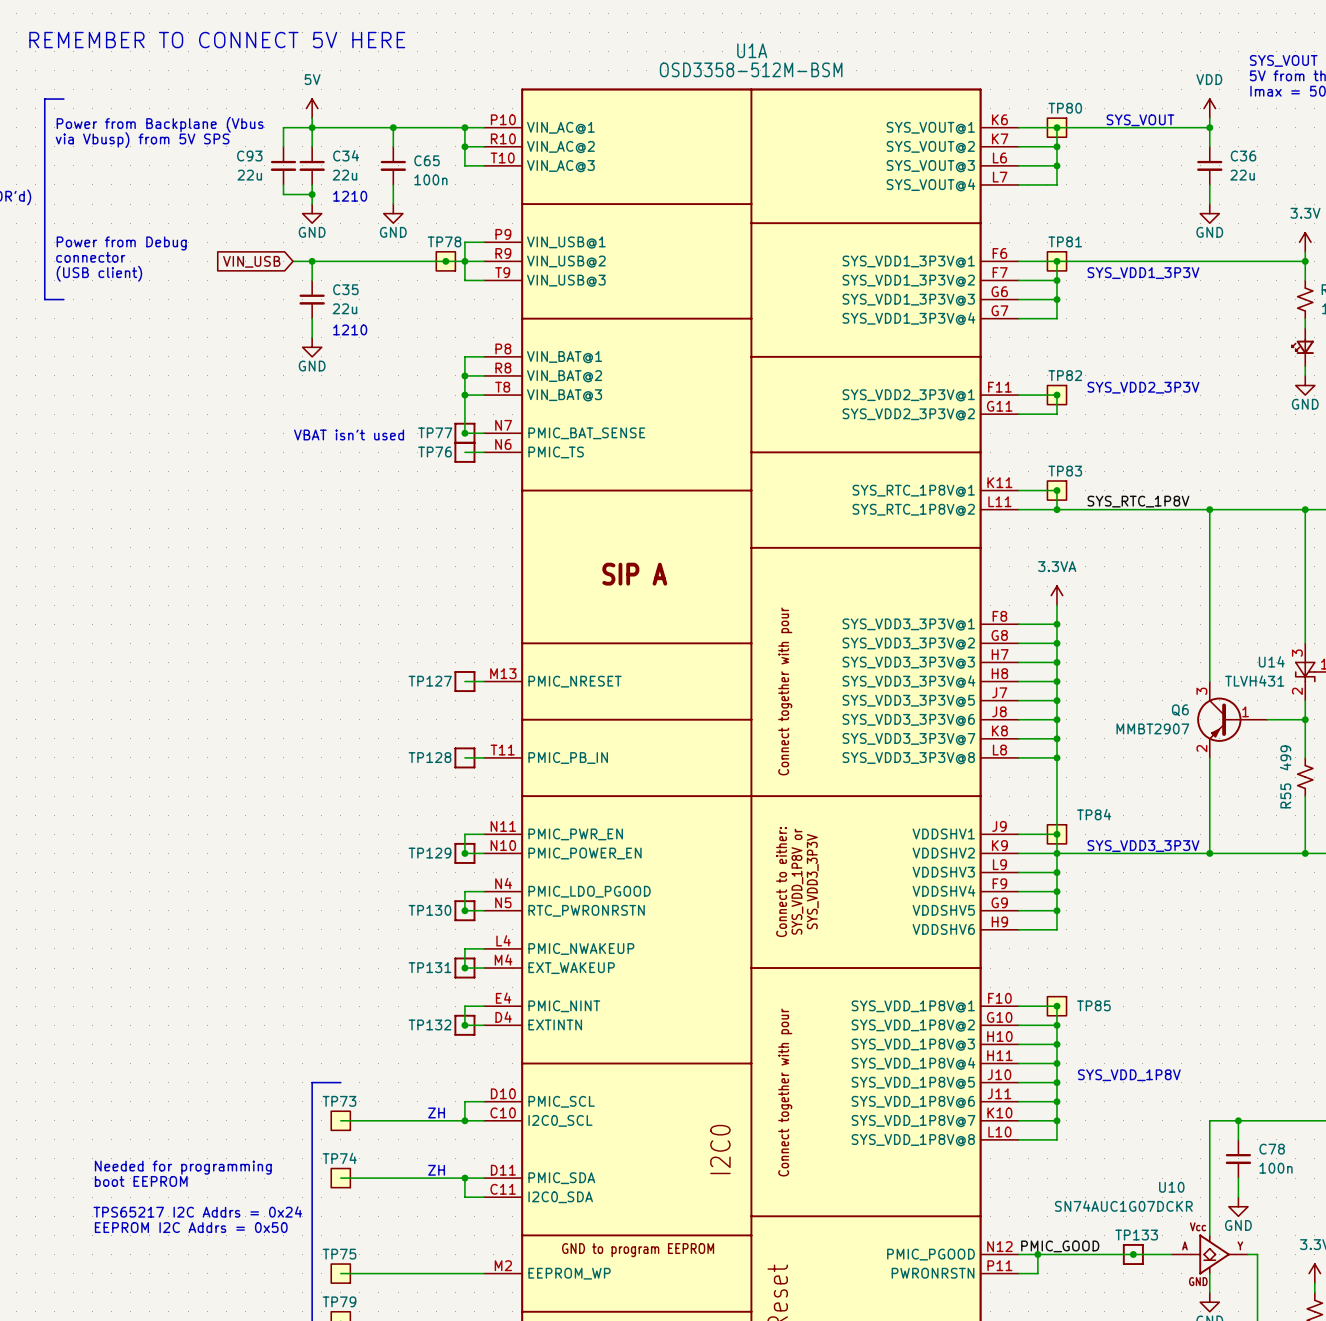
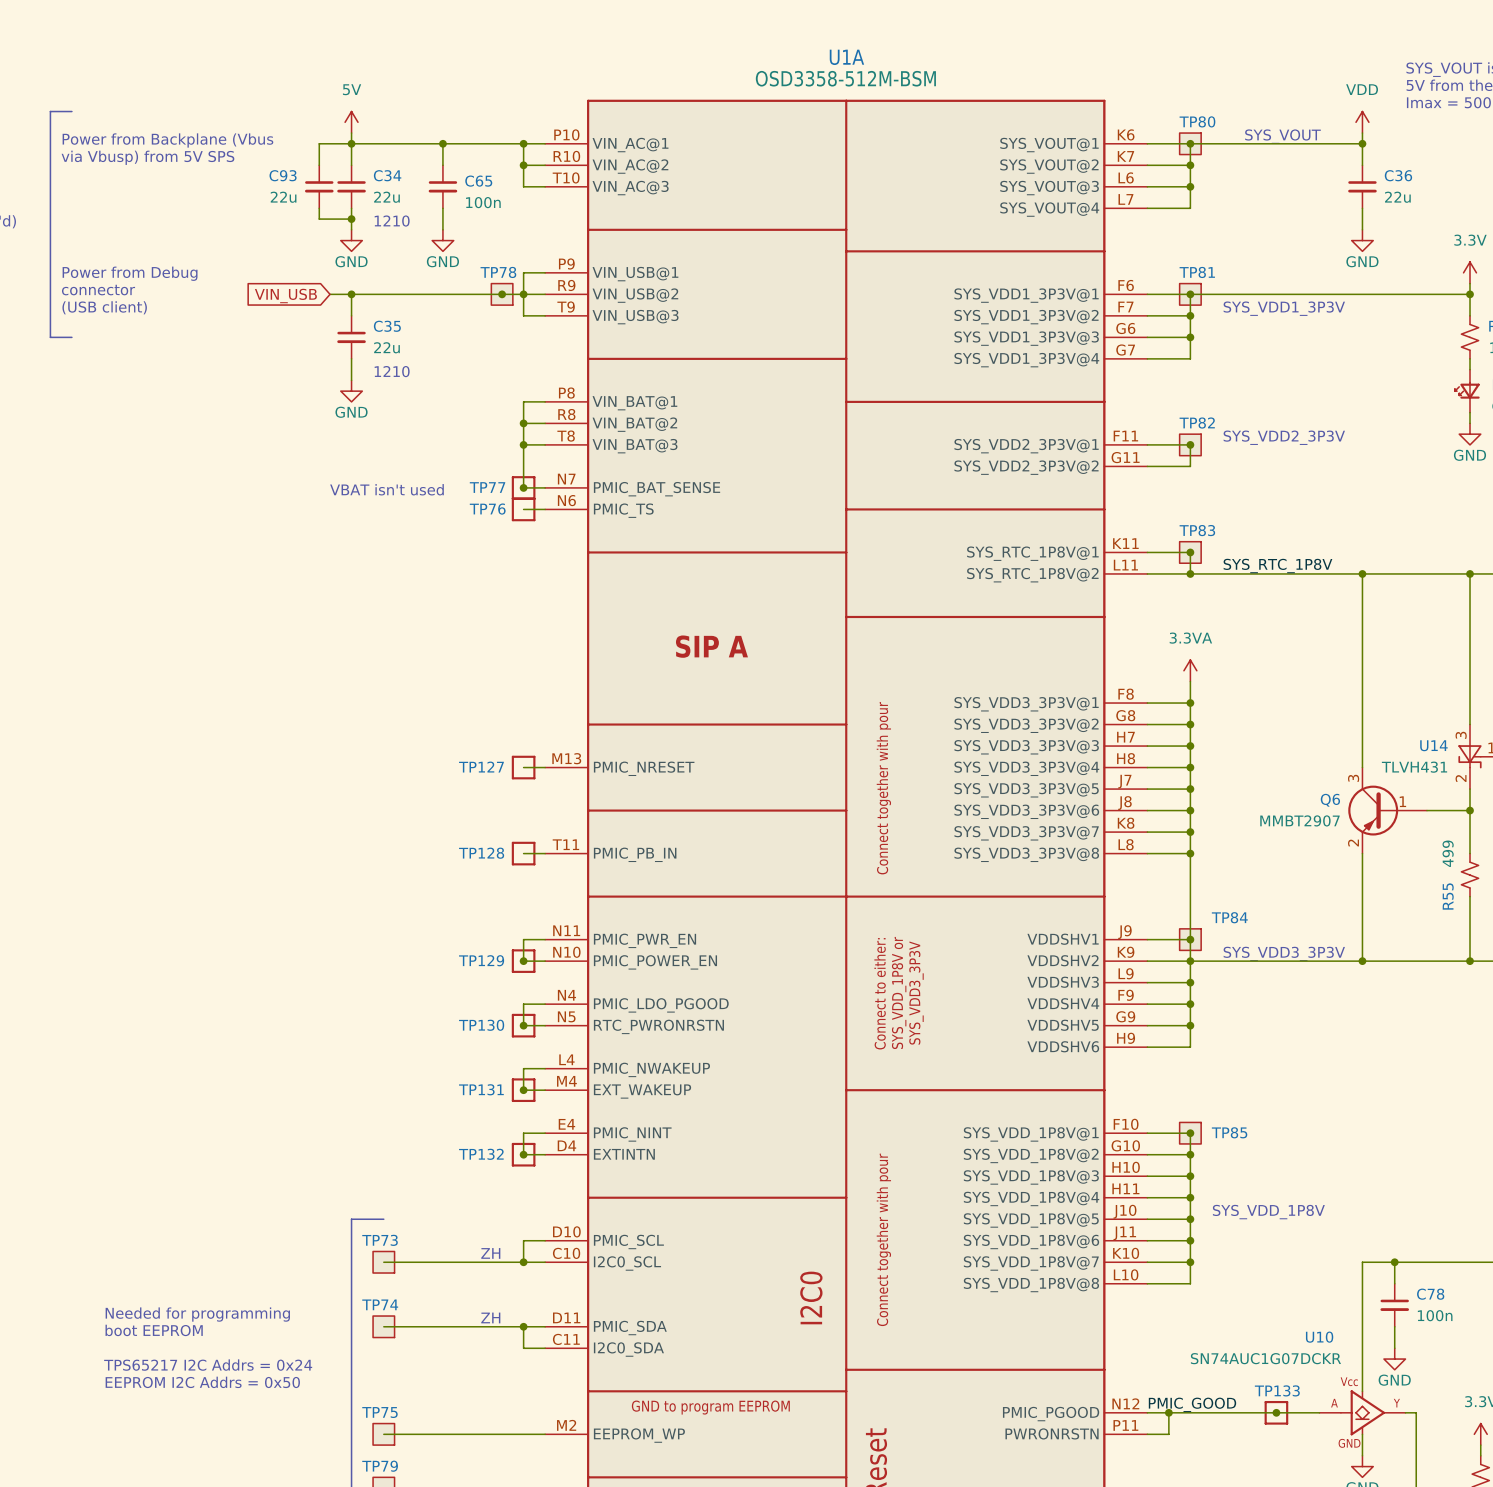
text: REMEMBER TO CONNECT 5V HERE (217, 40) -> none

